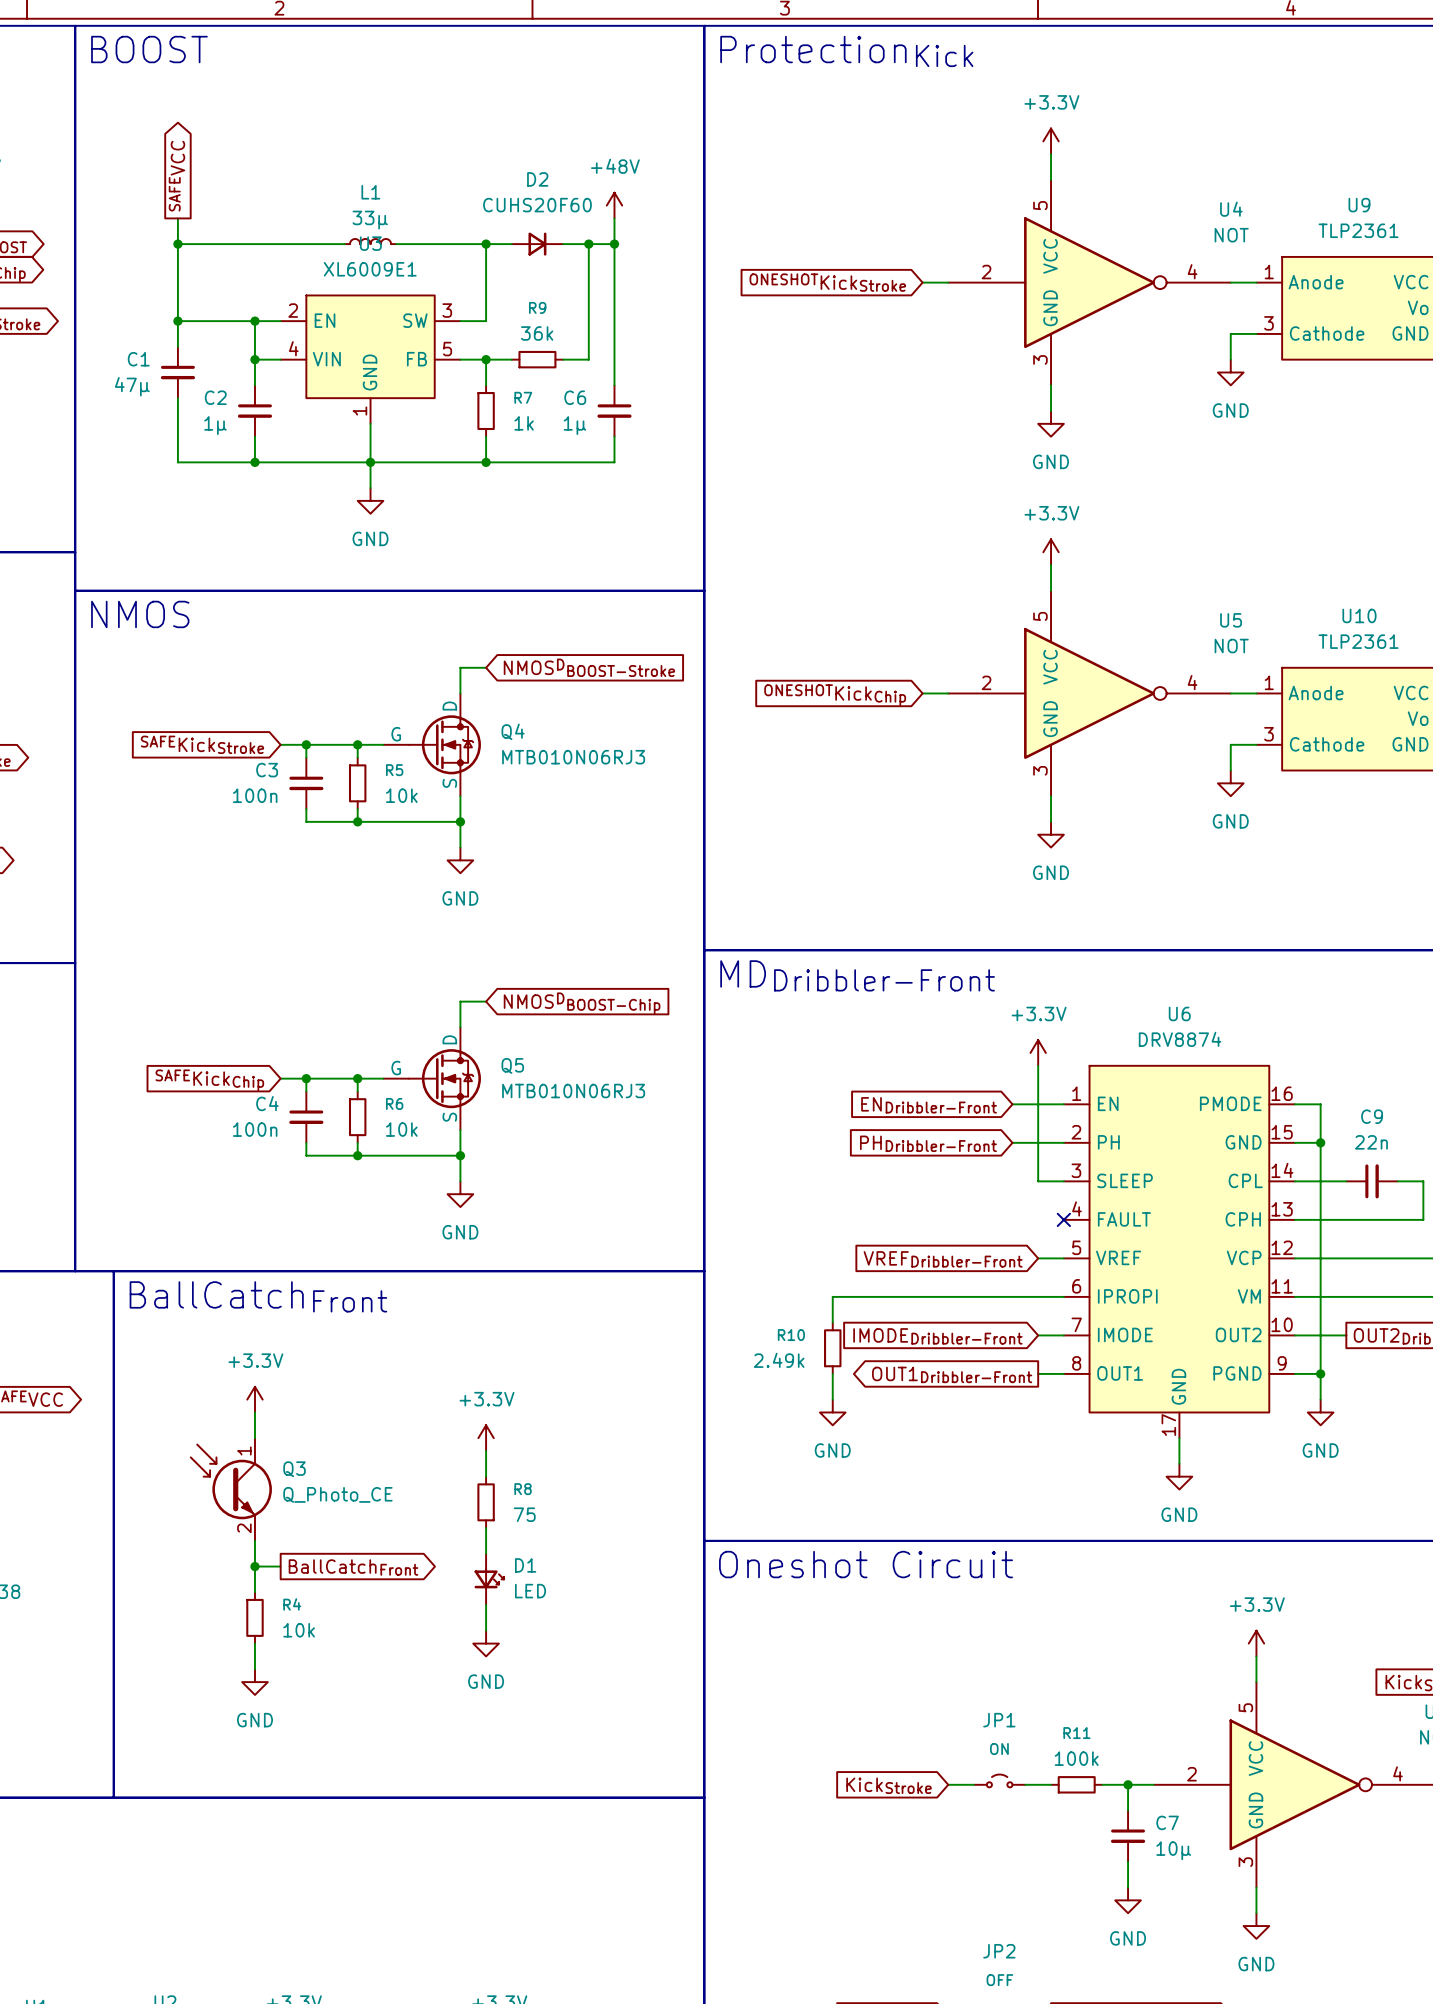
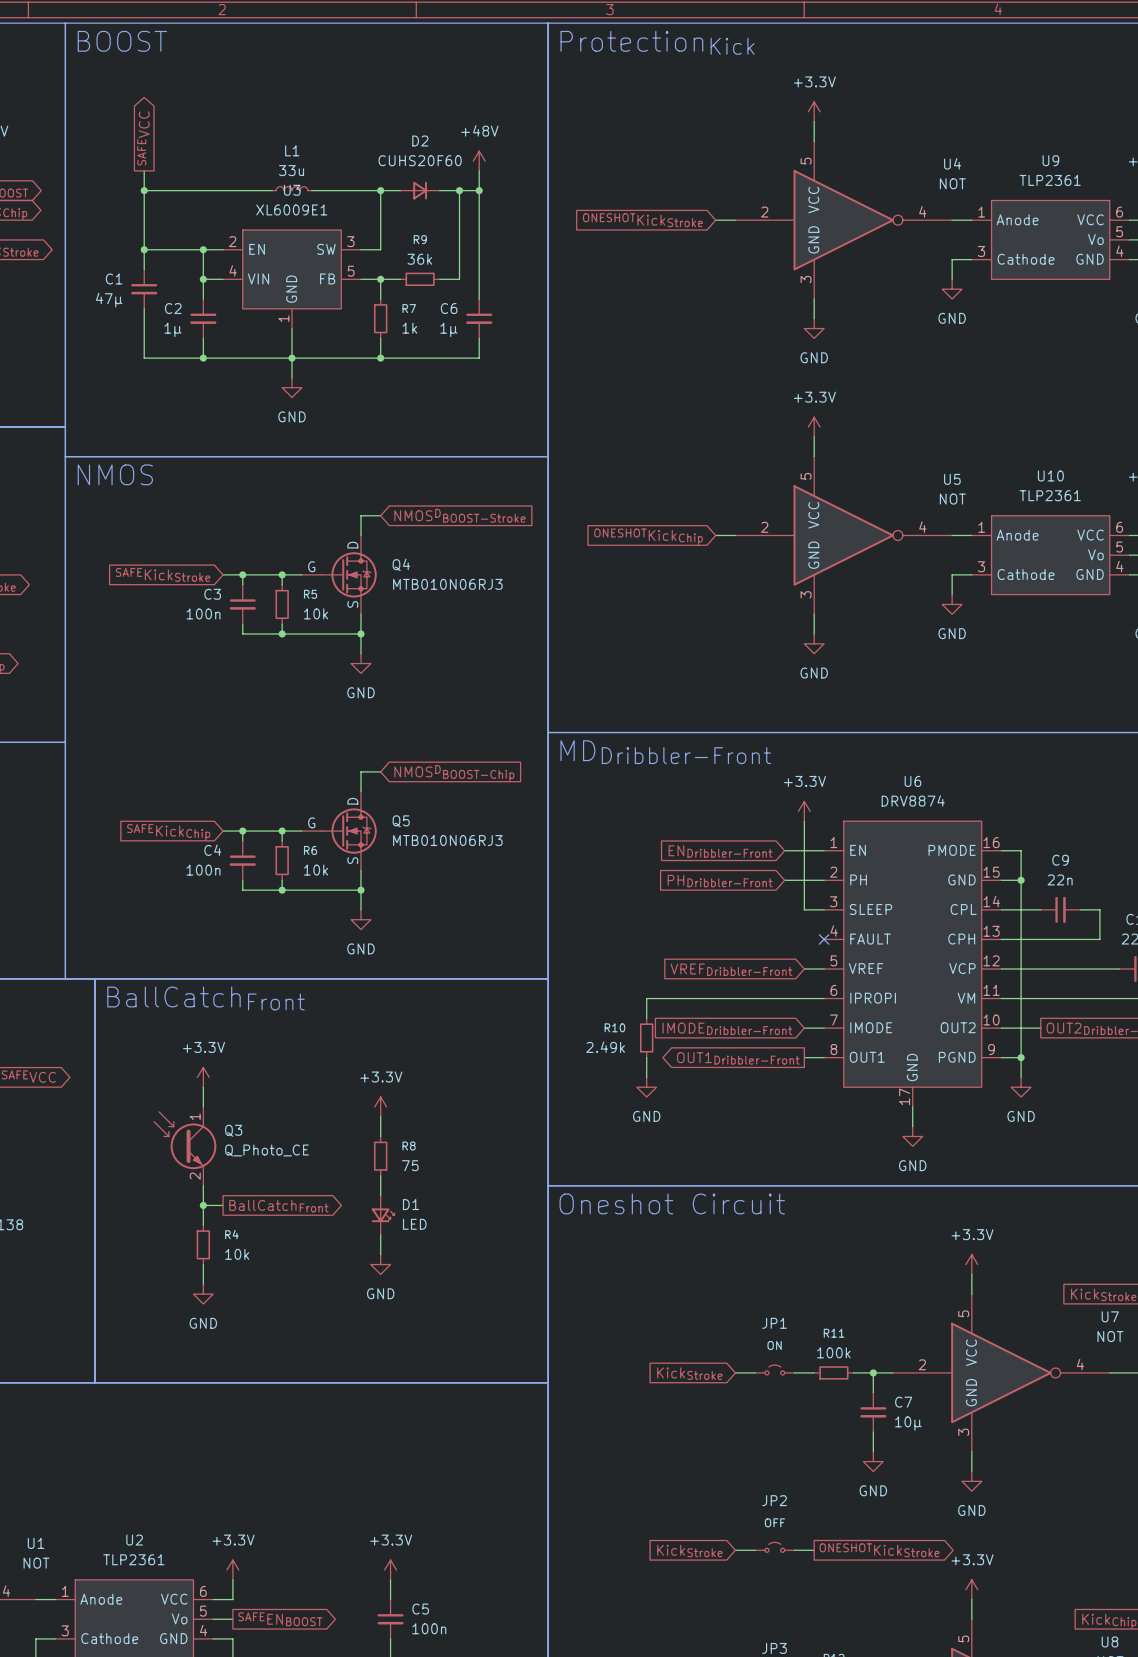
L1 value: 33μ (370, 220) -> 33u (291, 170)

